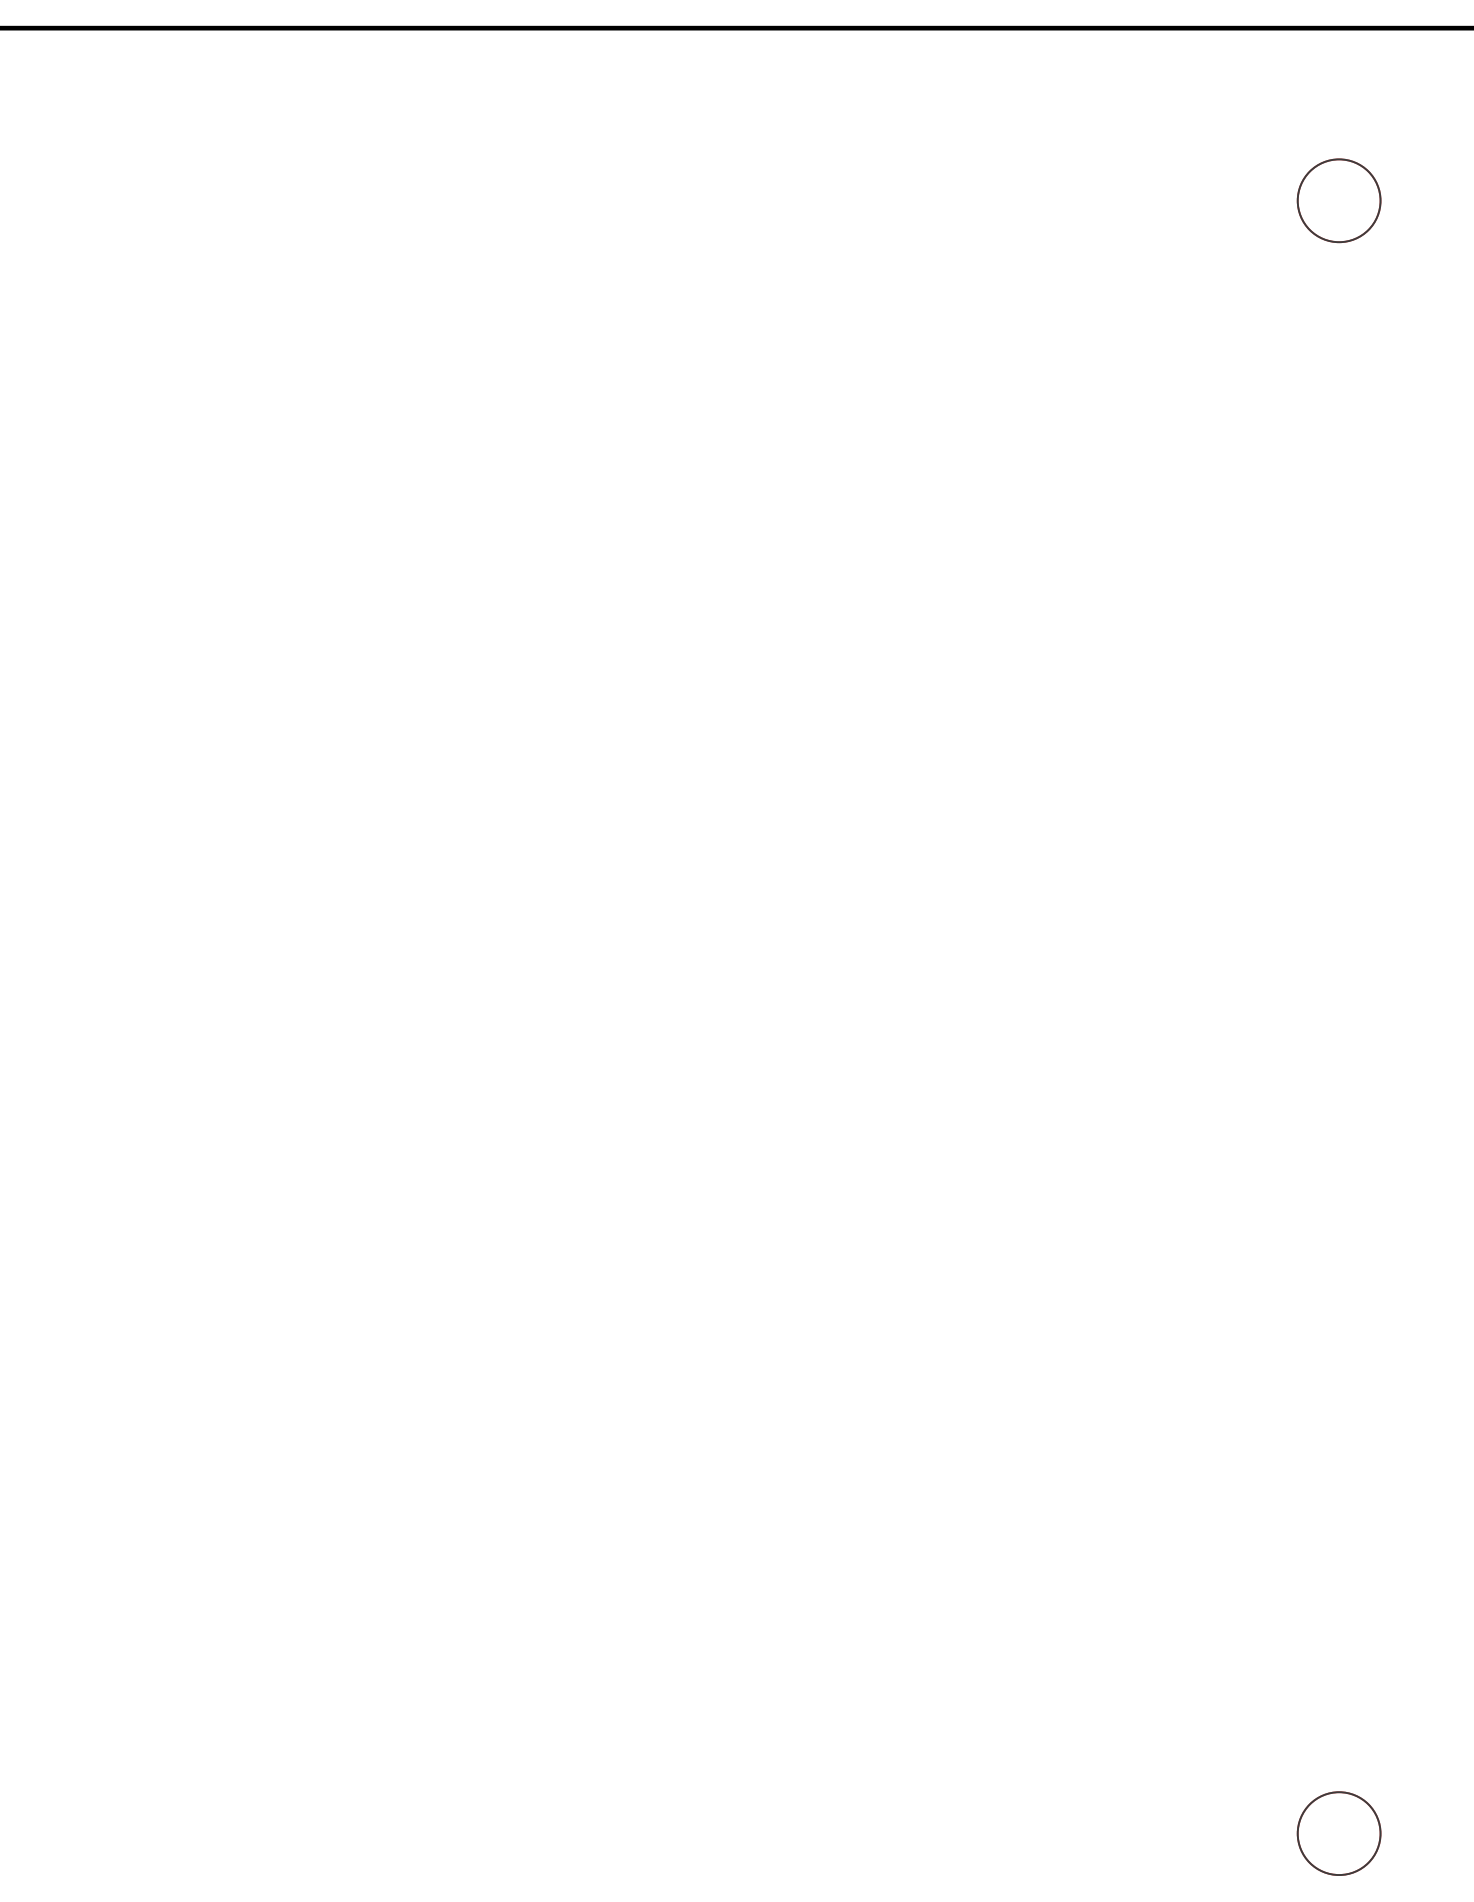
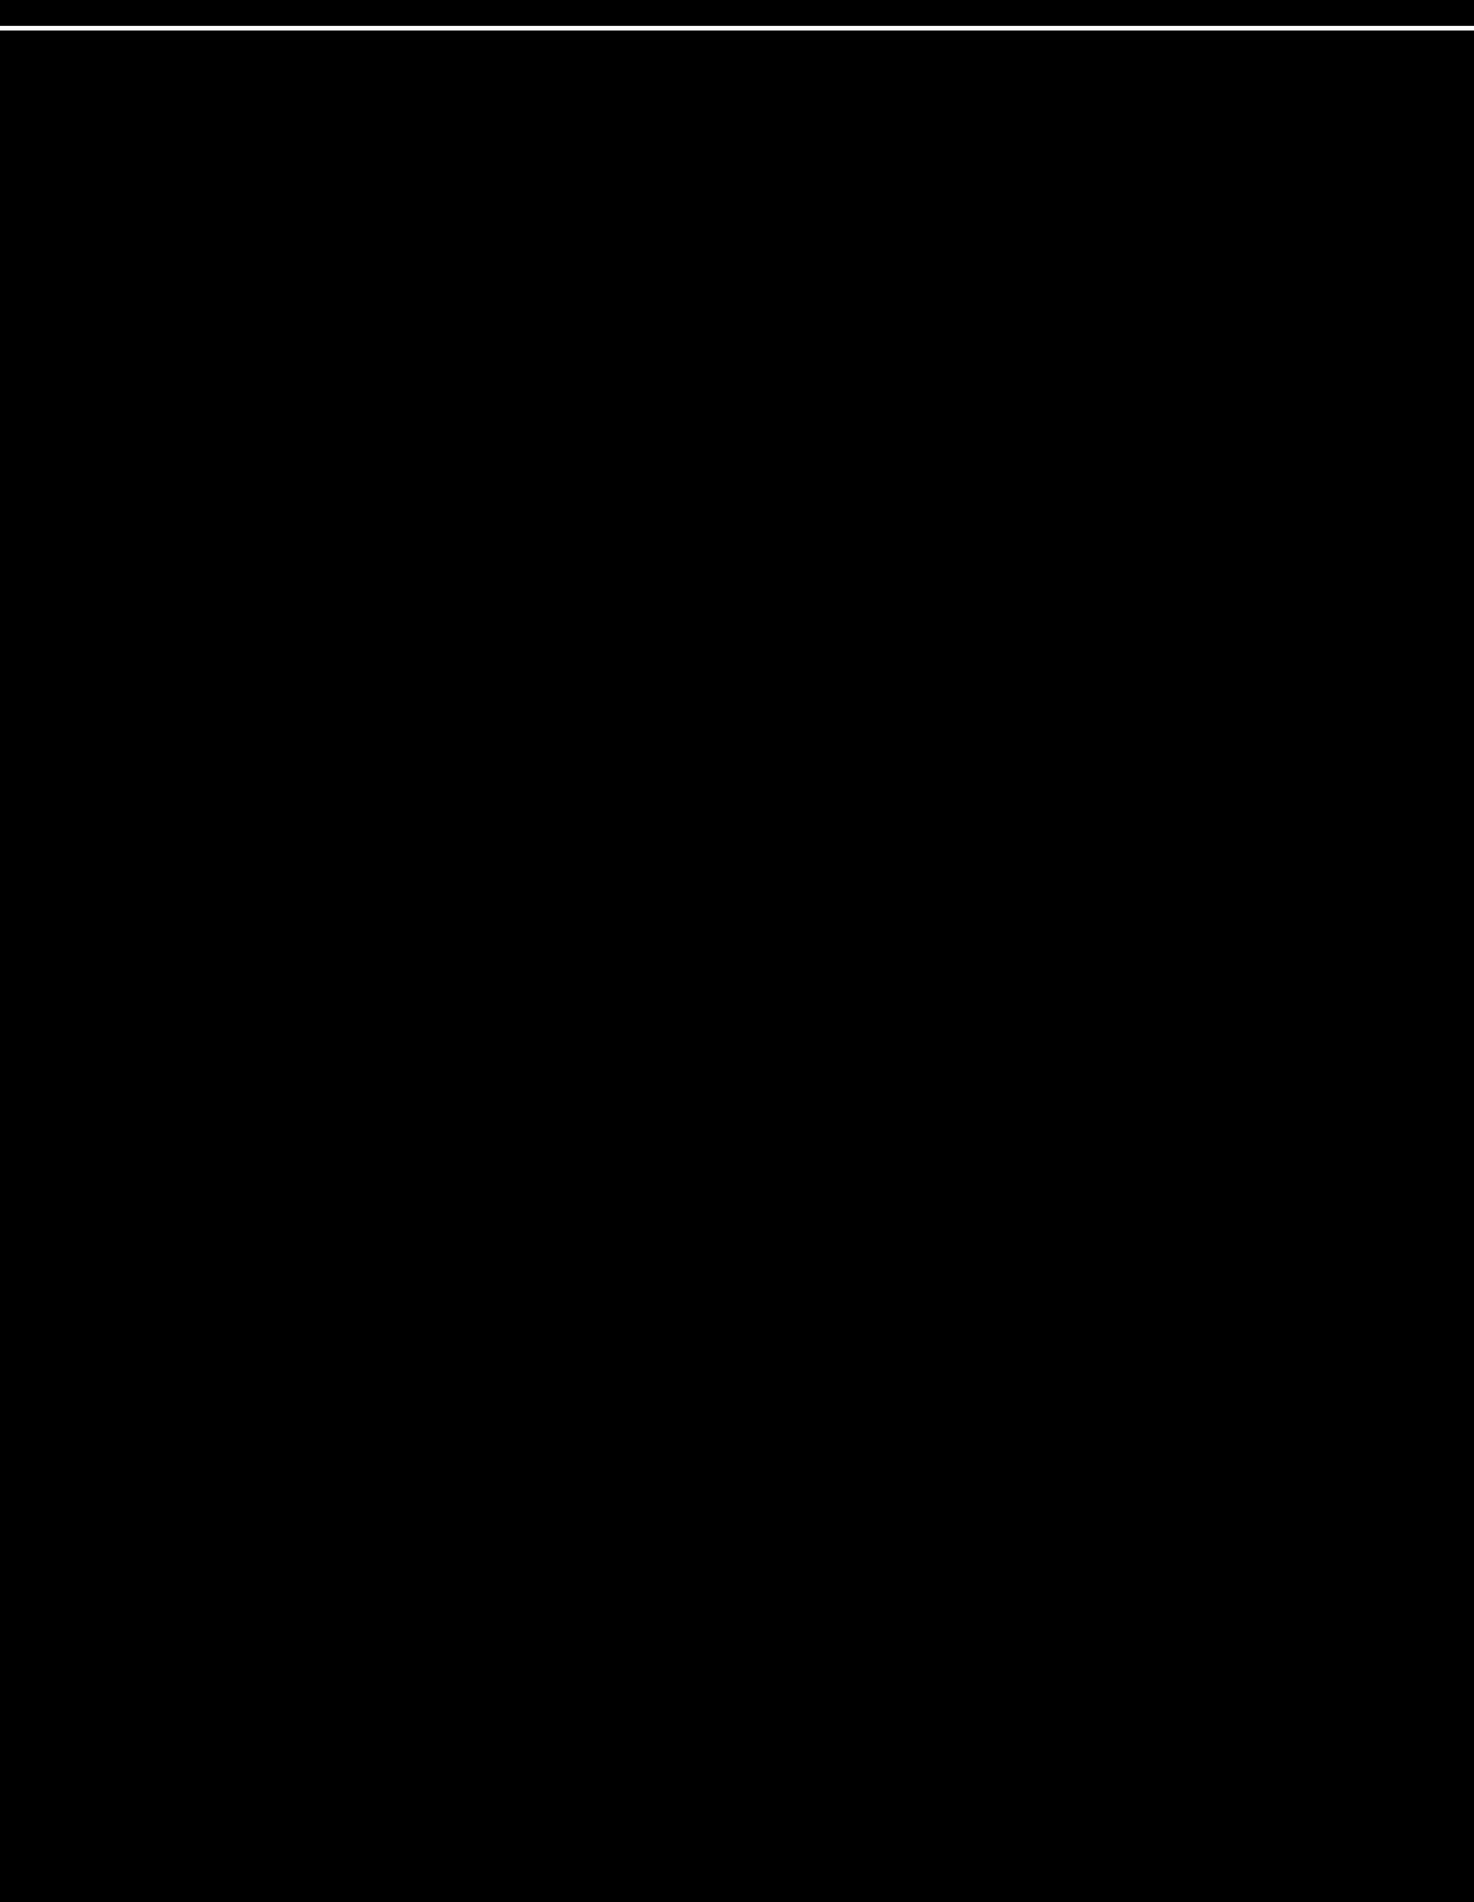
drawing: [1296, 158, 1382, 244] -> none
drawing: [1296, 1791, 1382, 1876] -> none

